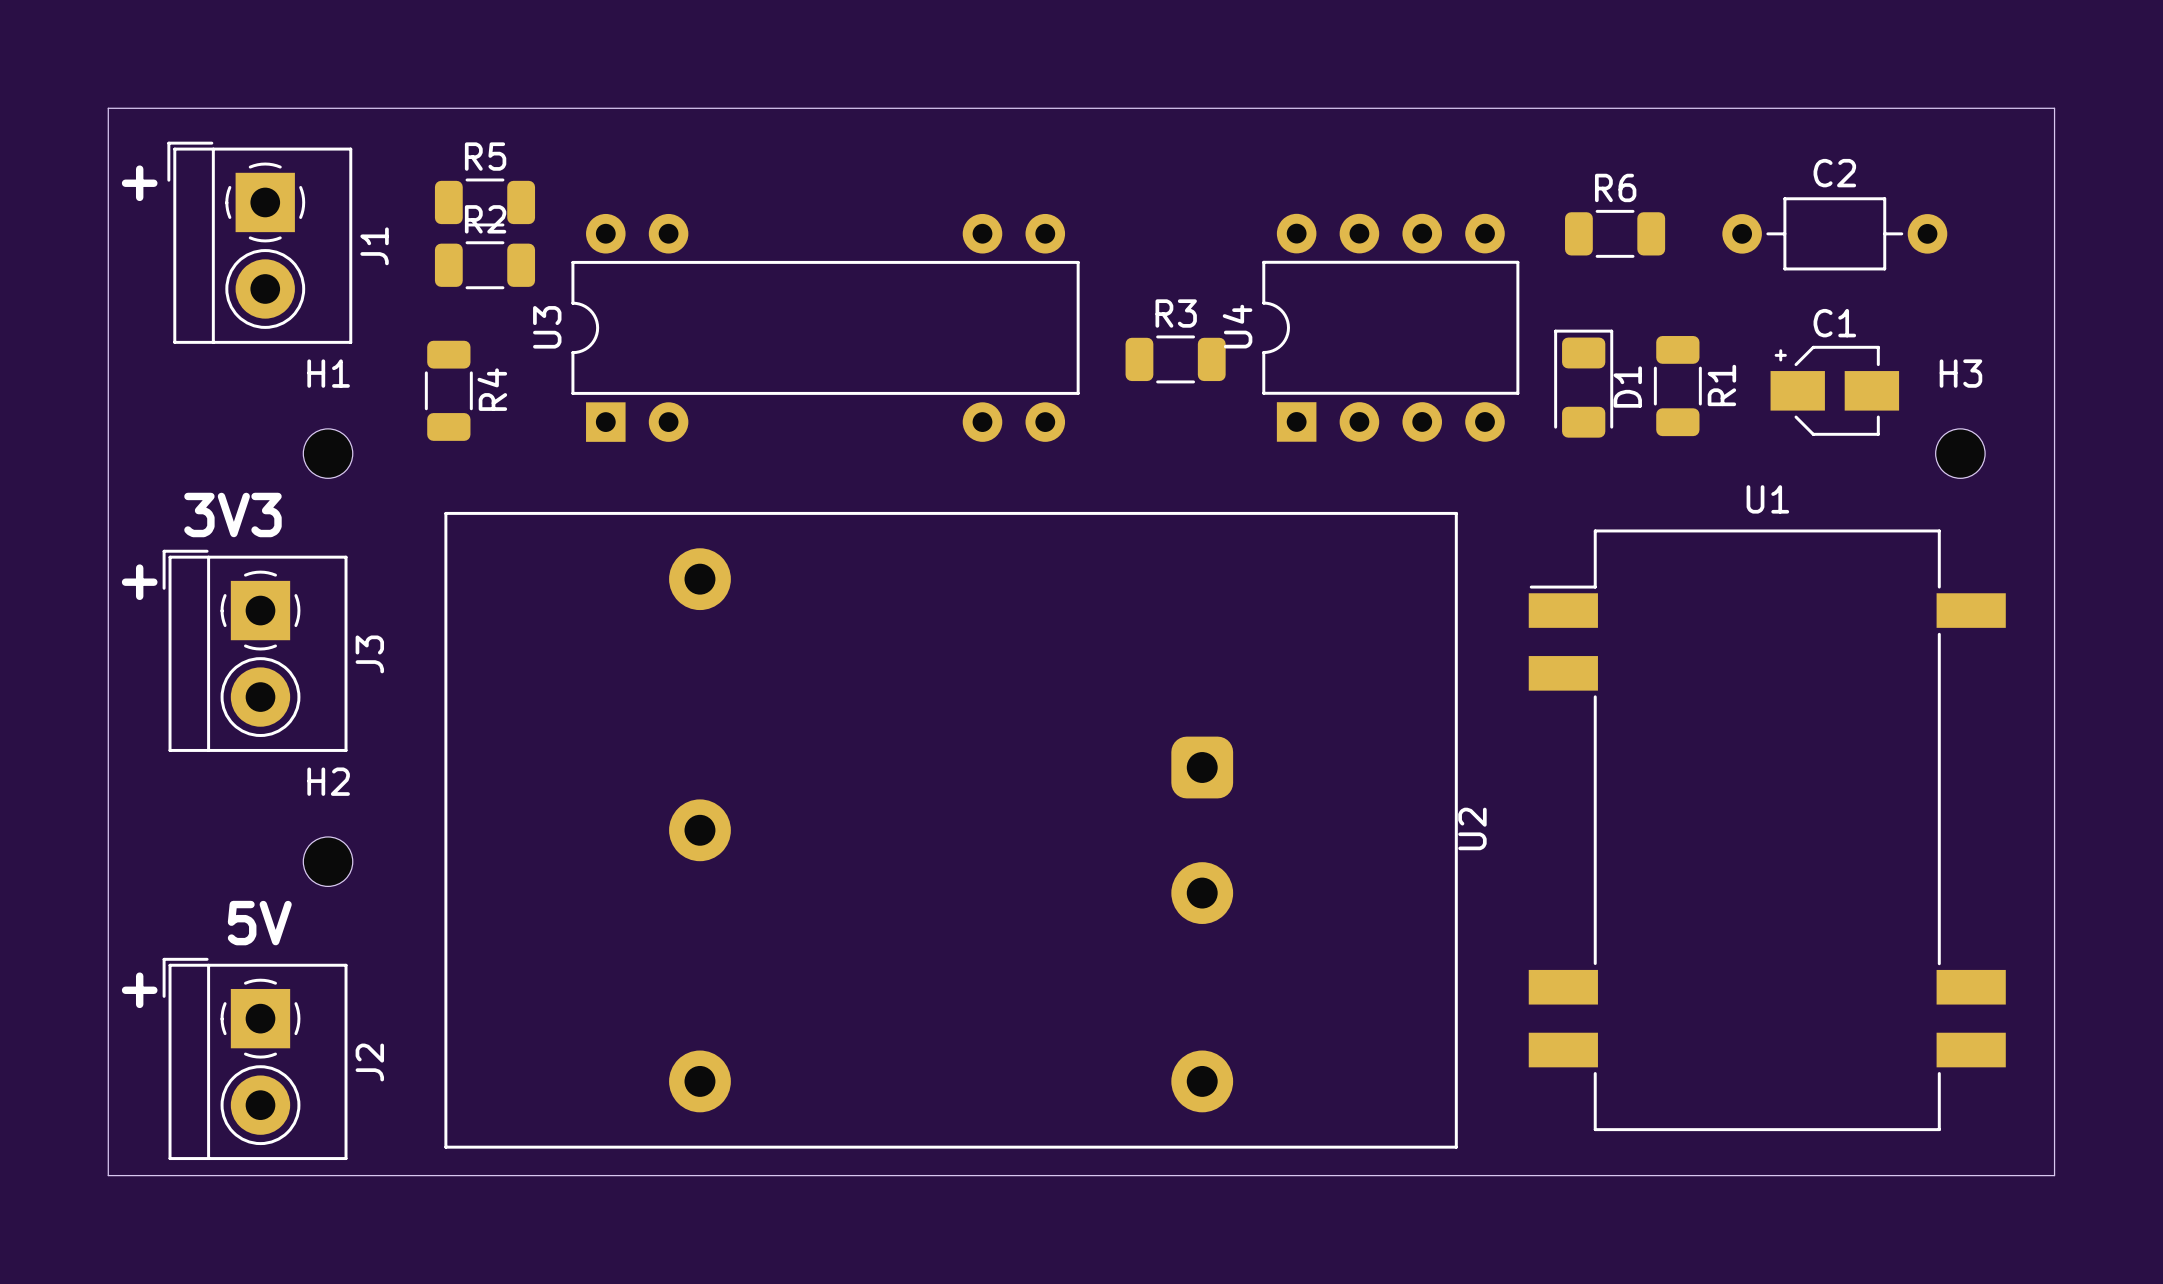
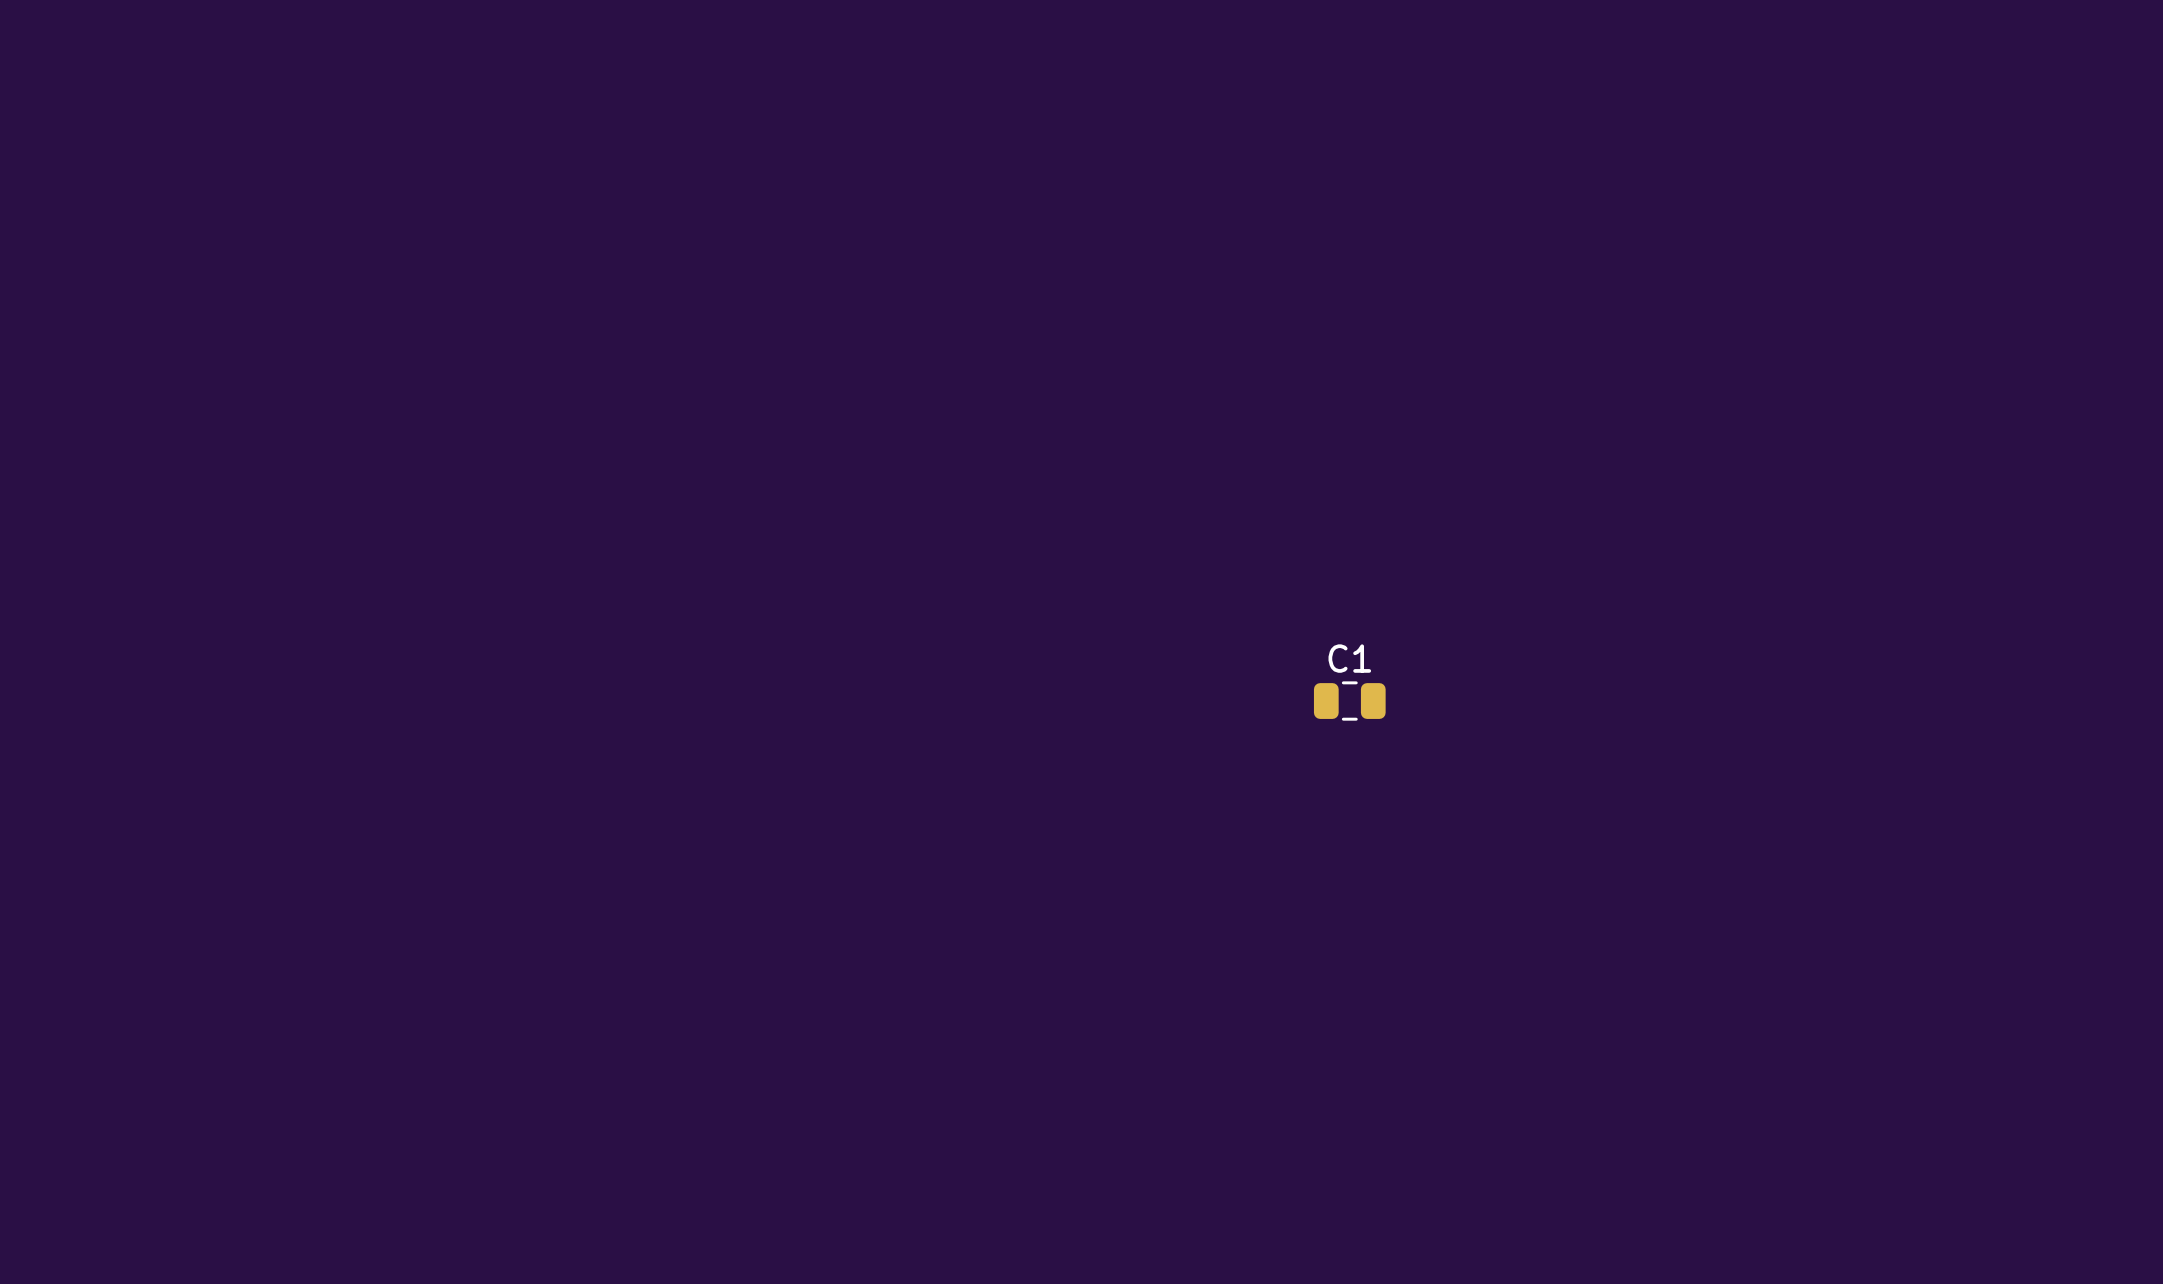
board edge: (108, 108) (2054, 108) (2054, 1175) (108, 1175) (108, 108) -> none
text: + (139, 183) -> none
R5: (484, 202) -> none
R6: (1615, 233) -> none
C2: (1834, 233) -> none
J1: (259, 242) -> none
R2: (484, 265) -> none
U3: (825, 327) -> none
U4: (1390, 327) -> none
C1 footprint: [1770, 345, 1900, 436] -> [1313, 681, 1386, 721]
R3: (1175, 359) -> none
D1: (1583, 383) -> none
R1: (1677, 386) -> none
R4: (448, 390) -> none
H1: (328, 453) -> none
H3: (1960, 453) -> none
text: 3V3 (232, 514) -> none
text: + (139, 582) -> none
J3: (255, 650) -> none
U2: (951, 830) -> none
U1: (1767, 830) -> none
H2: (328, 861) -> none
text: 5V (259, 923) -> none
text: + (139, 990) -> none
J2: (255, 1058) -> none

